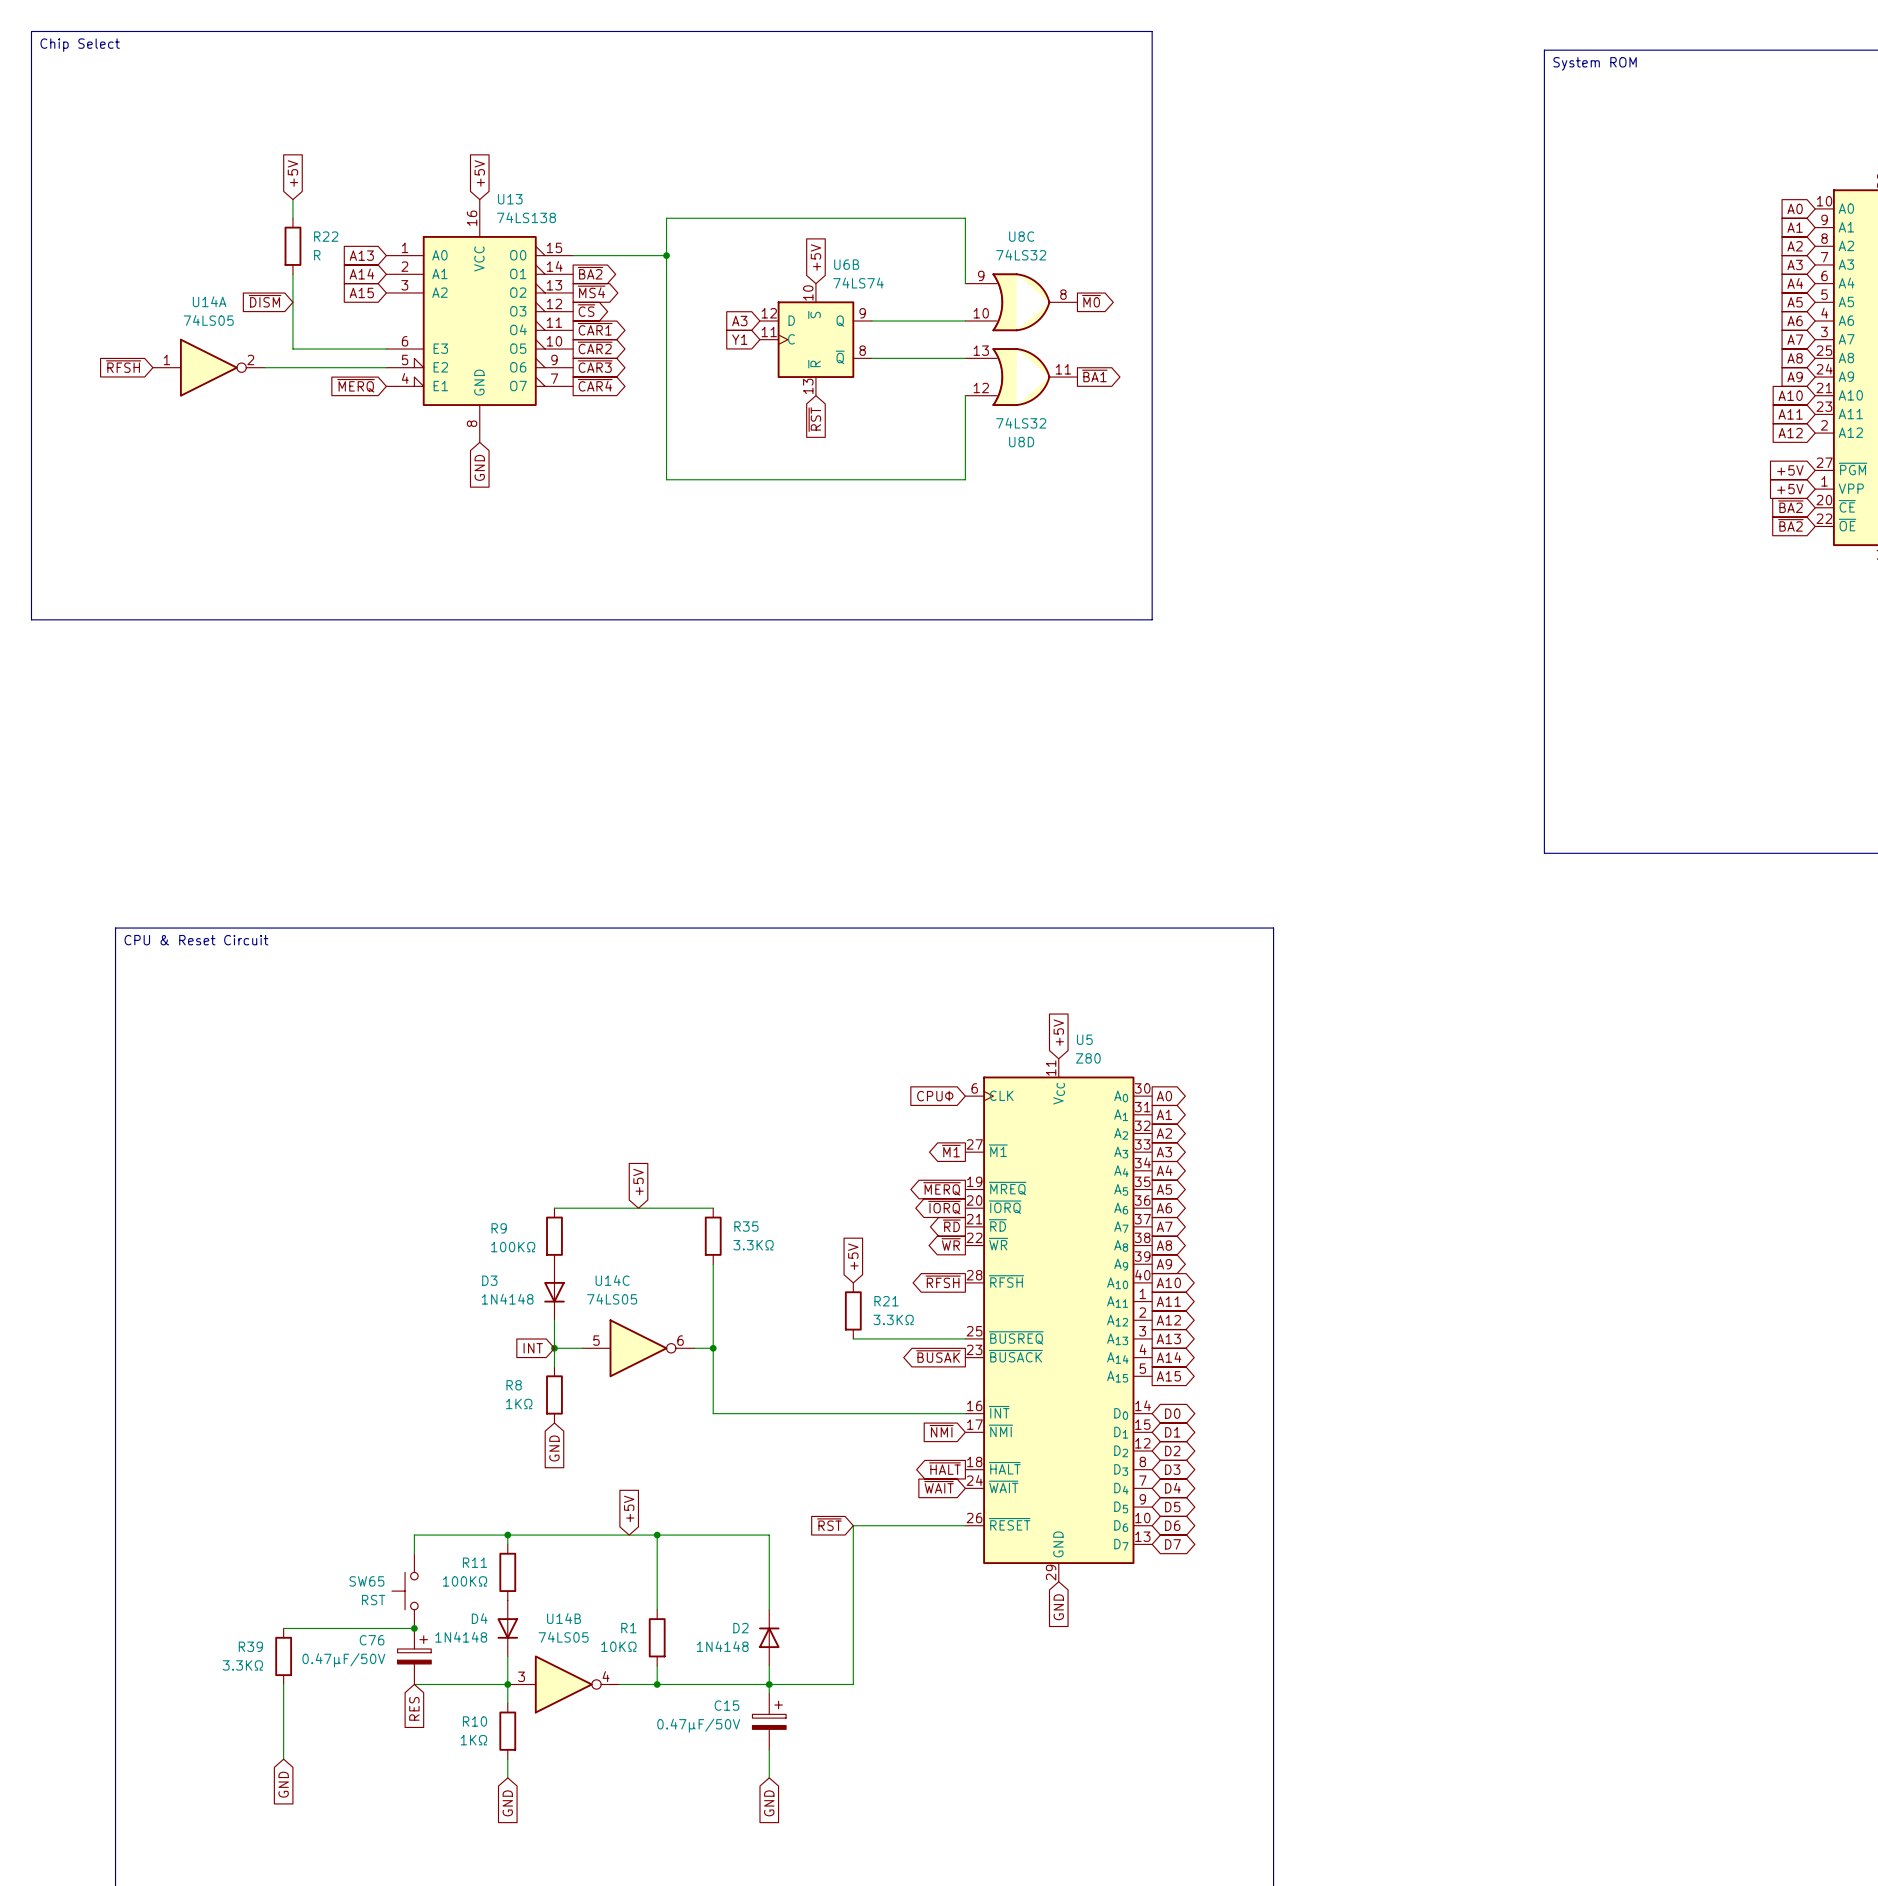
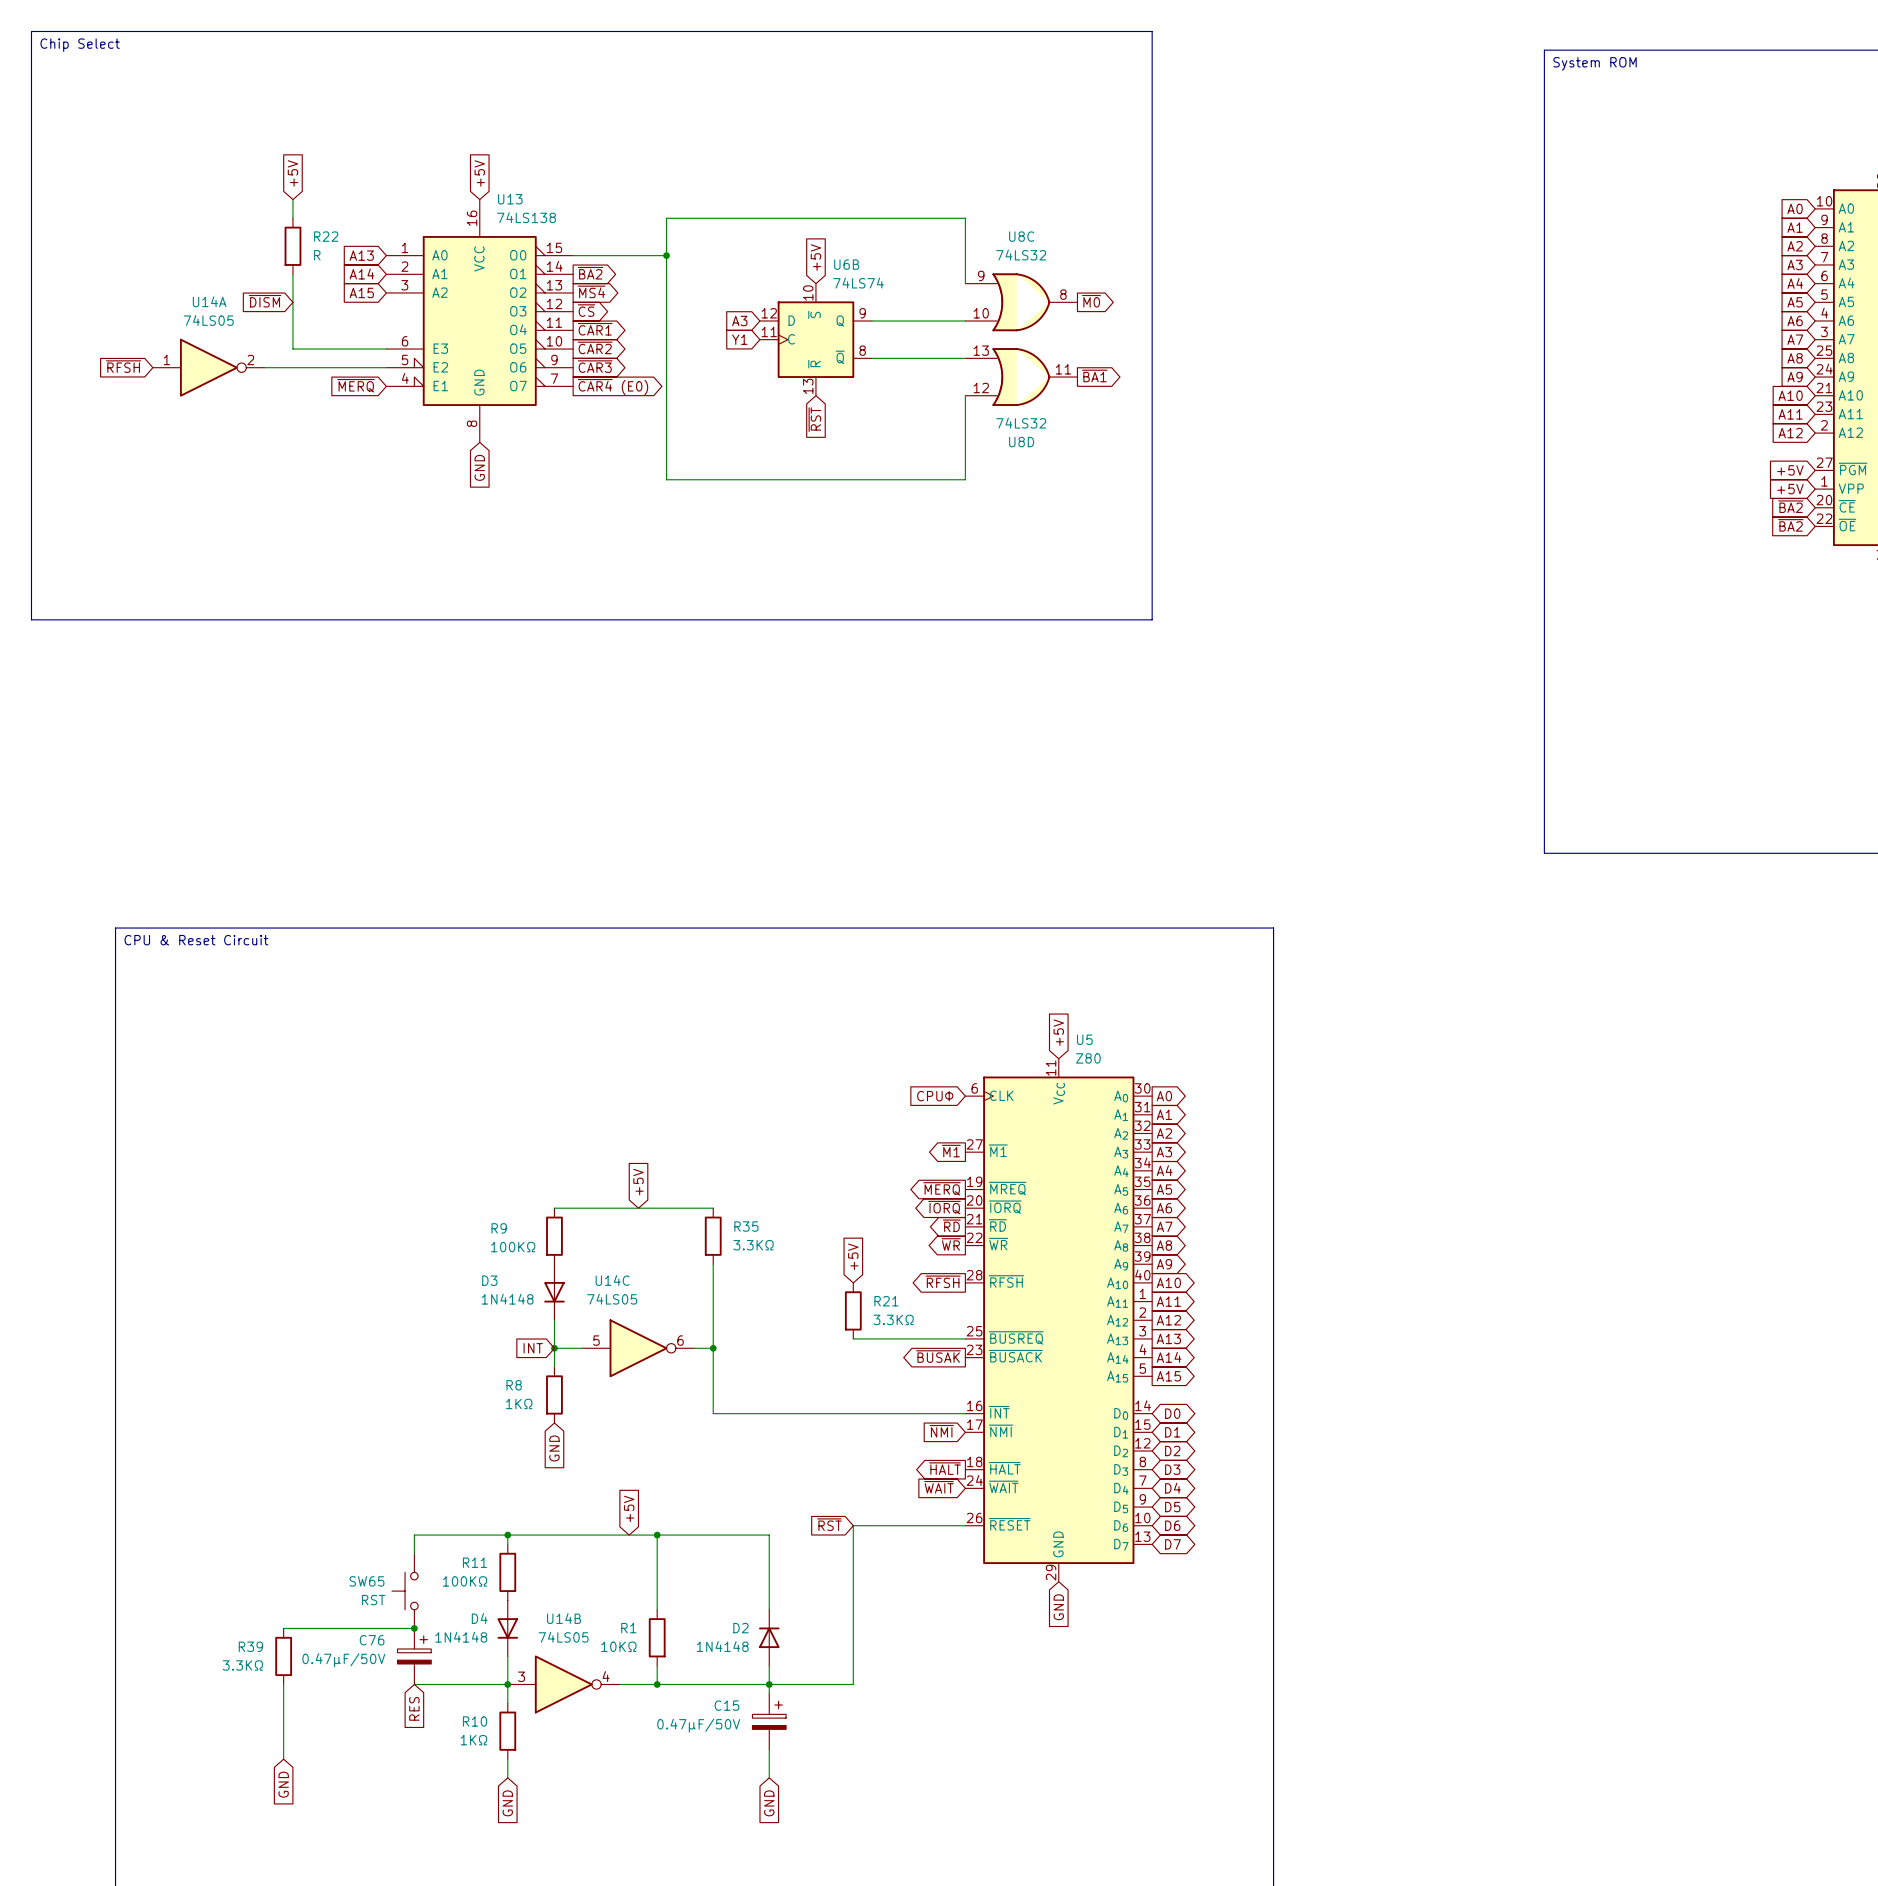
global label: ~{CAR4} (595, 385) -> ~{CAR4} (E0) (612, 387)

